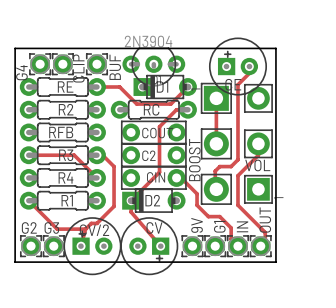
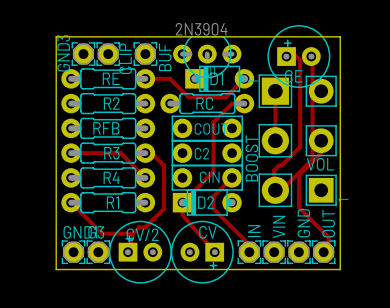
track: none -> (318, 54) (312, 60) (312, 159) (281, 190) (275, 190)
track: (249, 66) (256, 66) (237, 84) (237, 159) (231, 166) (222, 166) -> (293, 54) (300, 60) (300, 146) (281, 165)
G4 name: G4 (21, 72) -> GND3 (63, 53)
track: (176, 177) (181, 177) (197, 193) (197, 205) (208, 216) (219, 216) (231, 227) (231, 239) (237, 246) -> (232, 177) (213, 196) (213, 208) (256, 252)
9V name: 9V (197, 225) -> IN (254, 231)
G1 name: G1 (219, 226) -> VIN (279, 226)
IN name: IN (242, 226) -> GND (303, 223)
G2 name: G2 (29, 227) -> GND1 (80, 232)

